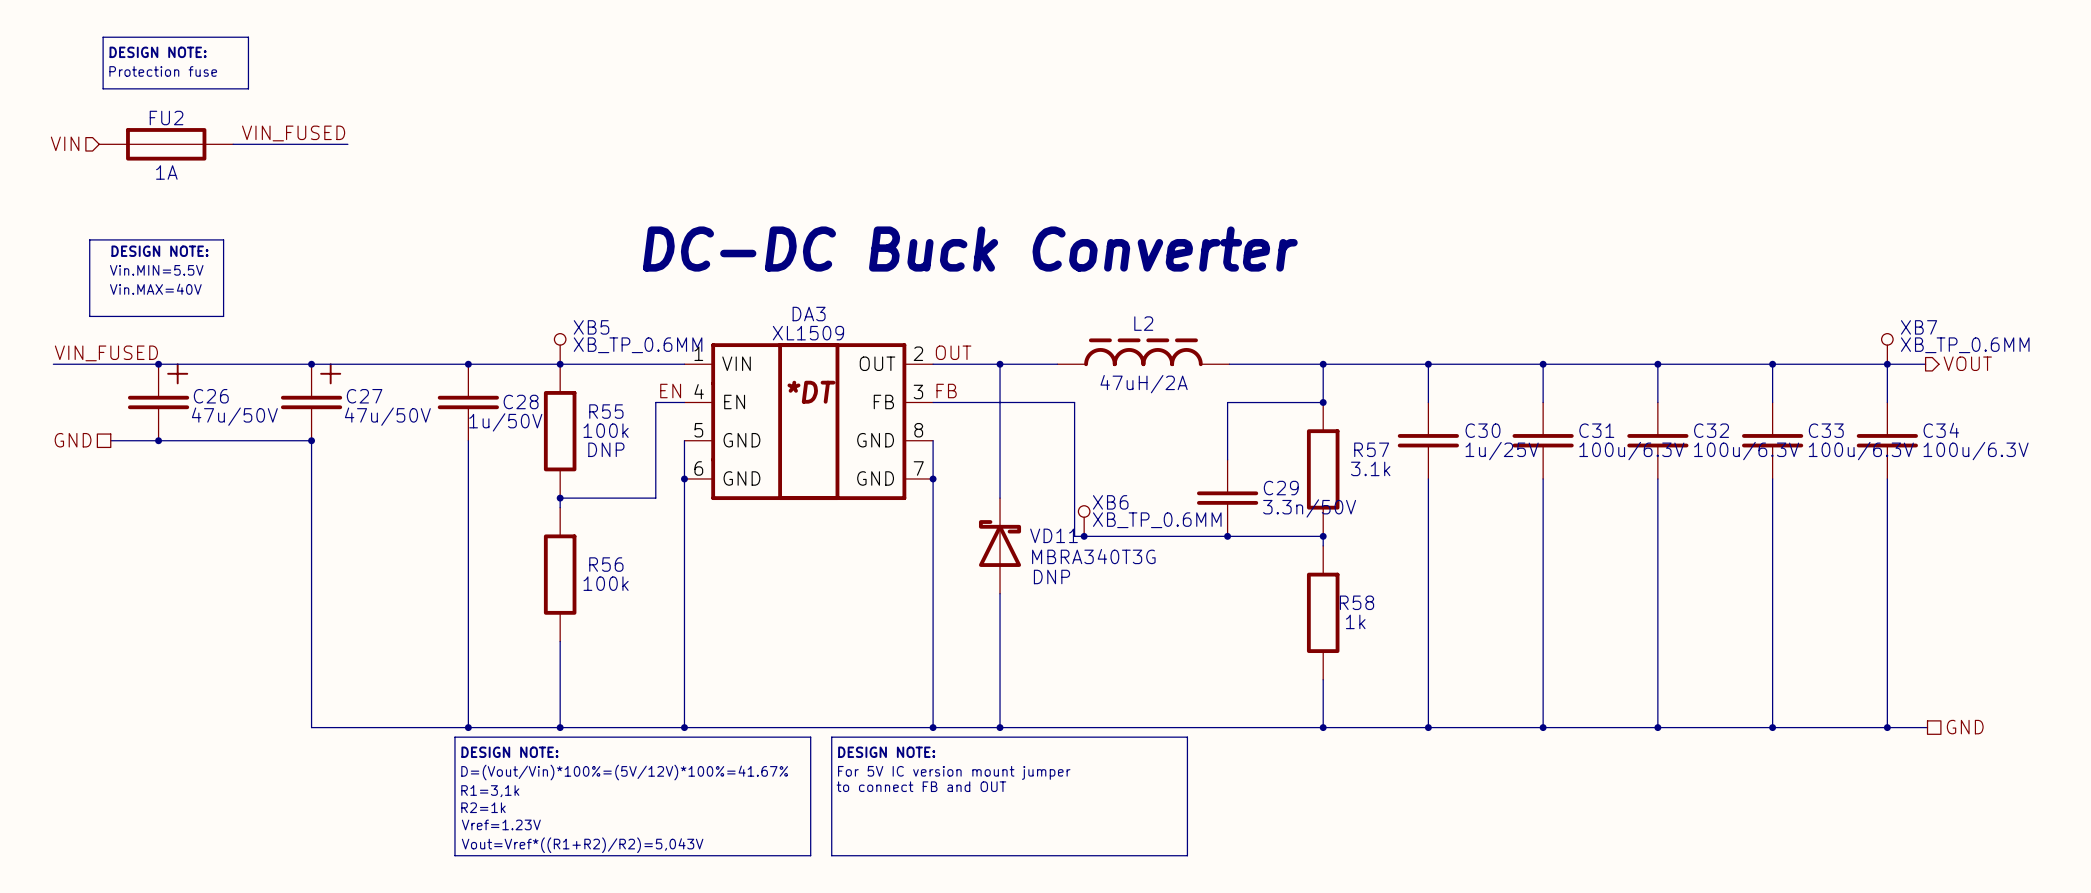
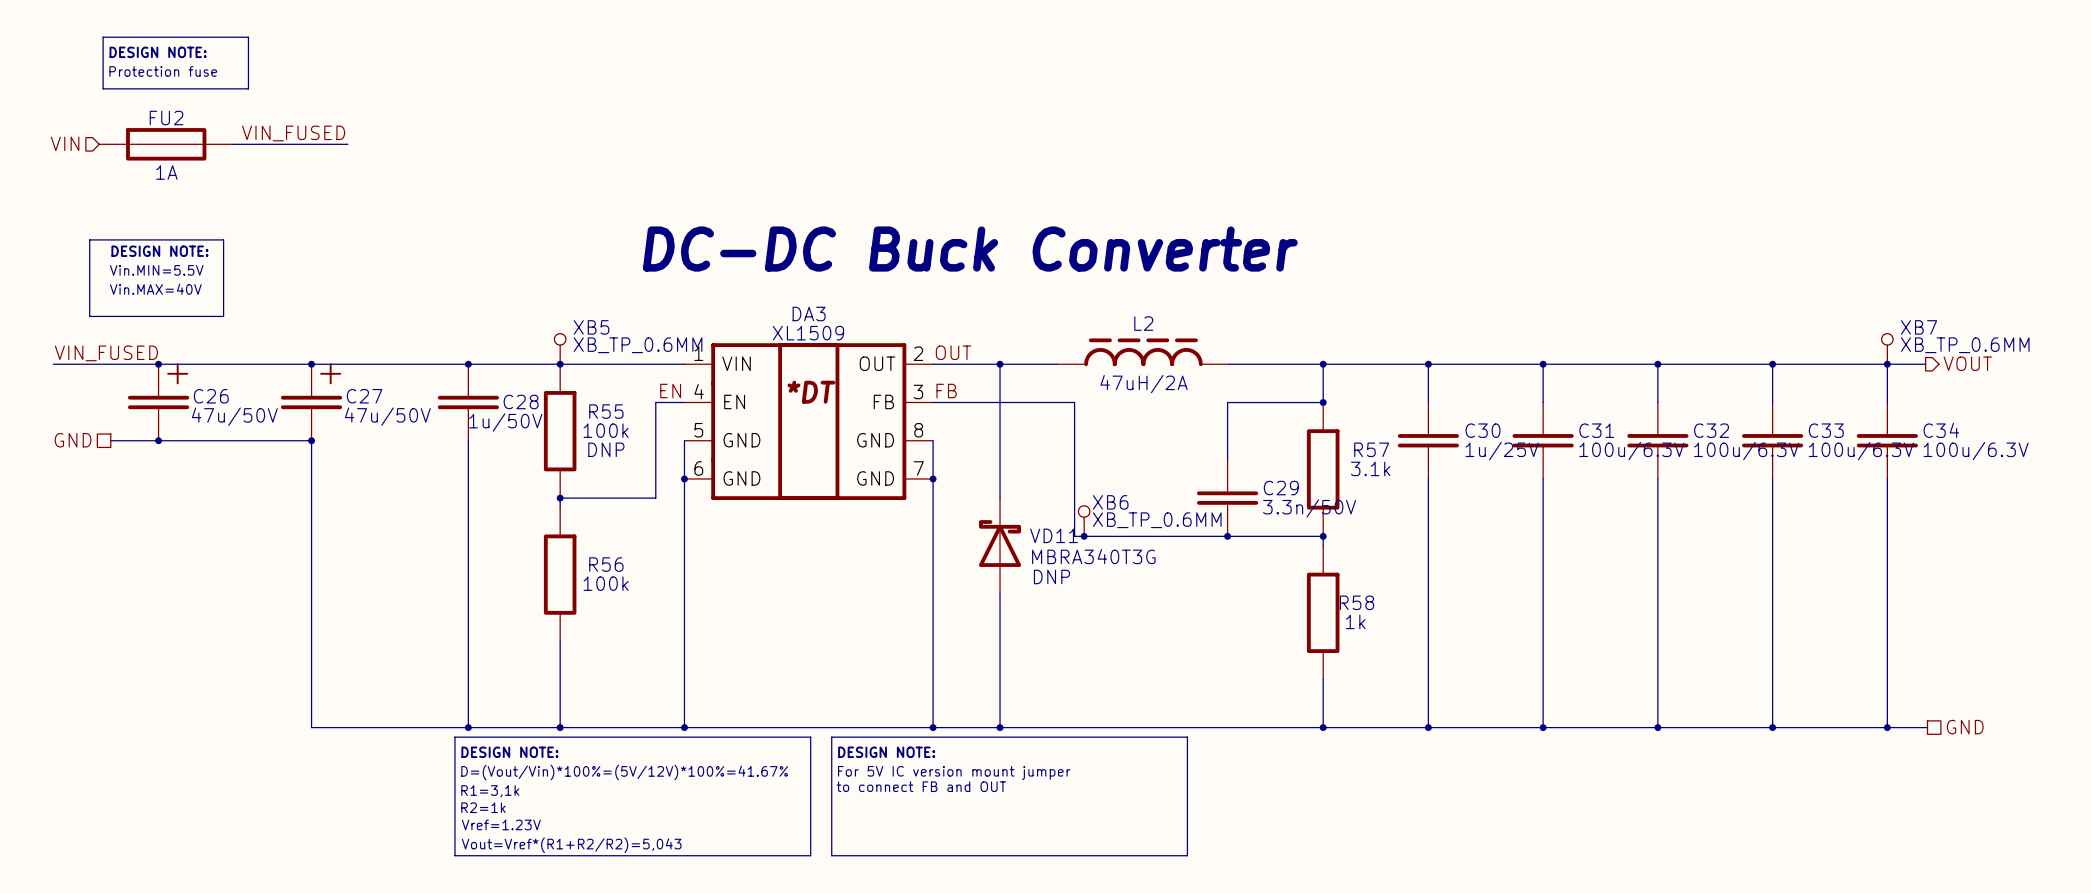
text: Vout=Vref*((R1+R2)/R2)=5,043V (582, 845) -> Vout=Vref*(R1+R2/R2)=5,043 (571, 845)

